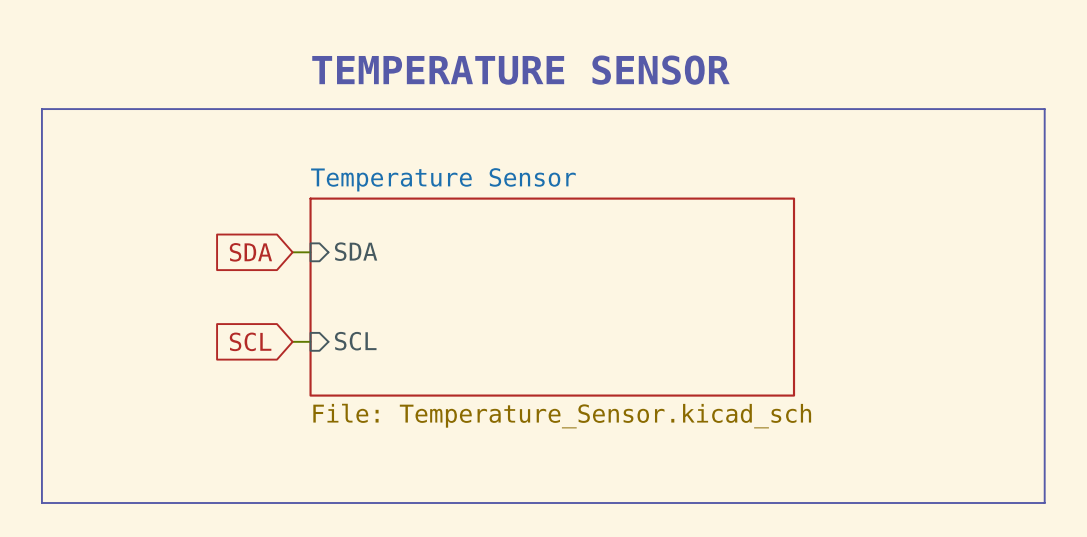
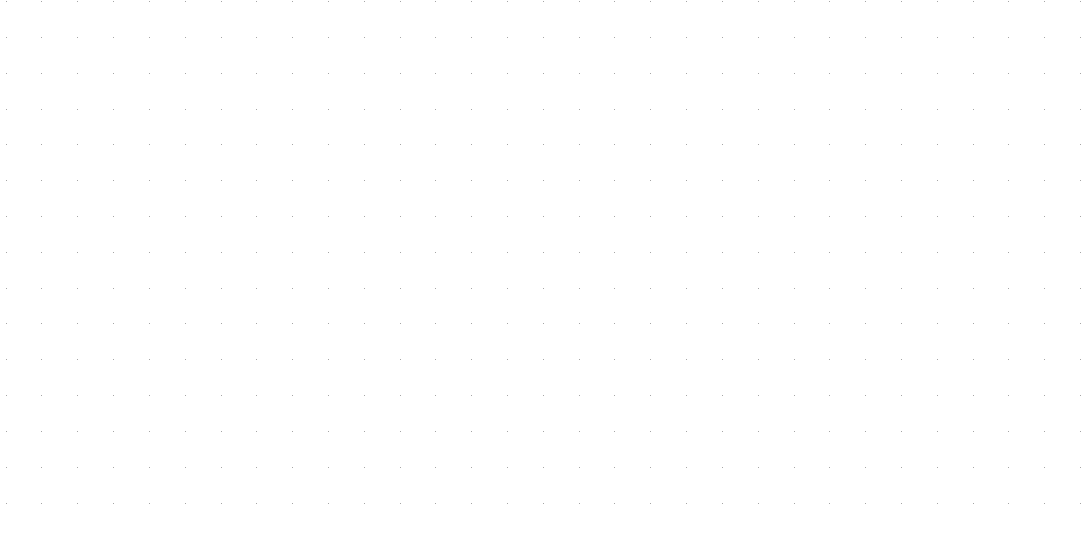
text: TEMPERATURE SENSOR (520, 70) -> none
line: (41, 109) (1044, 109) (1044, 503) (41, 503) (41, 109) -> none
sheet pin: SDA (356, 251) -> none
global label: SDA (250, 252) -> none
wire: (292, 252) (310, 252) -> none
sheet Temperature Sensor: File: Temperature_Sensor.kicad_sch (552, 297) -> none
global label: SCL (250, 341) -> none
wire: (292, 341) (310, 341) -> none
sheet pin: SCL (355, 341) -> none

